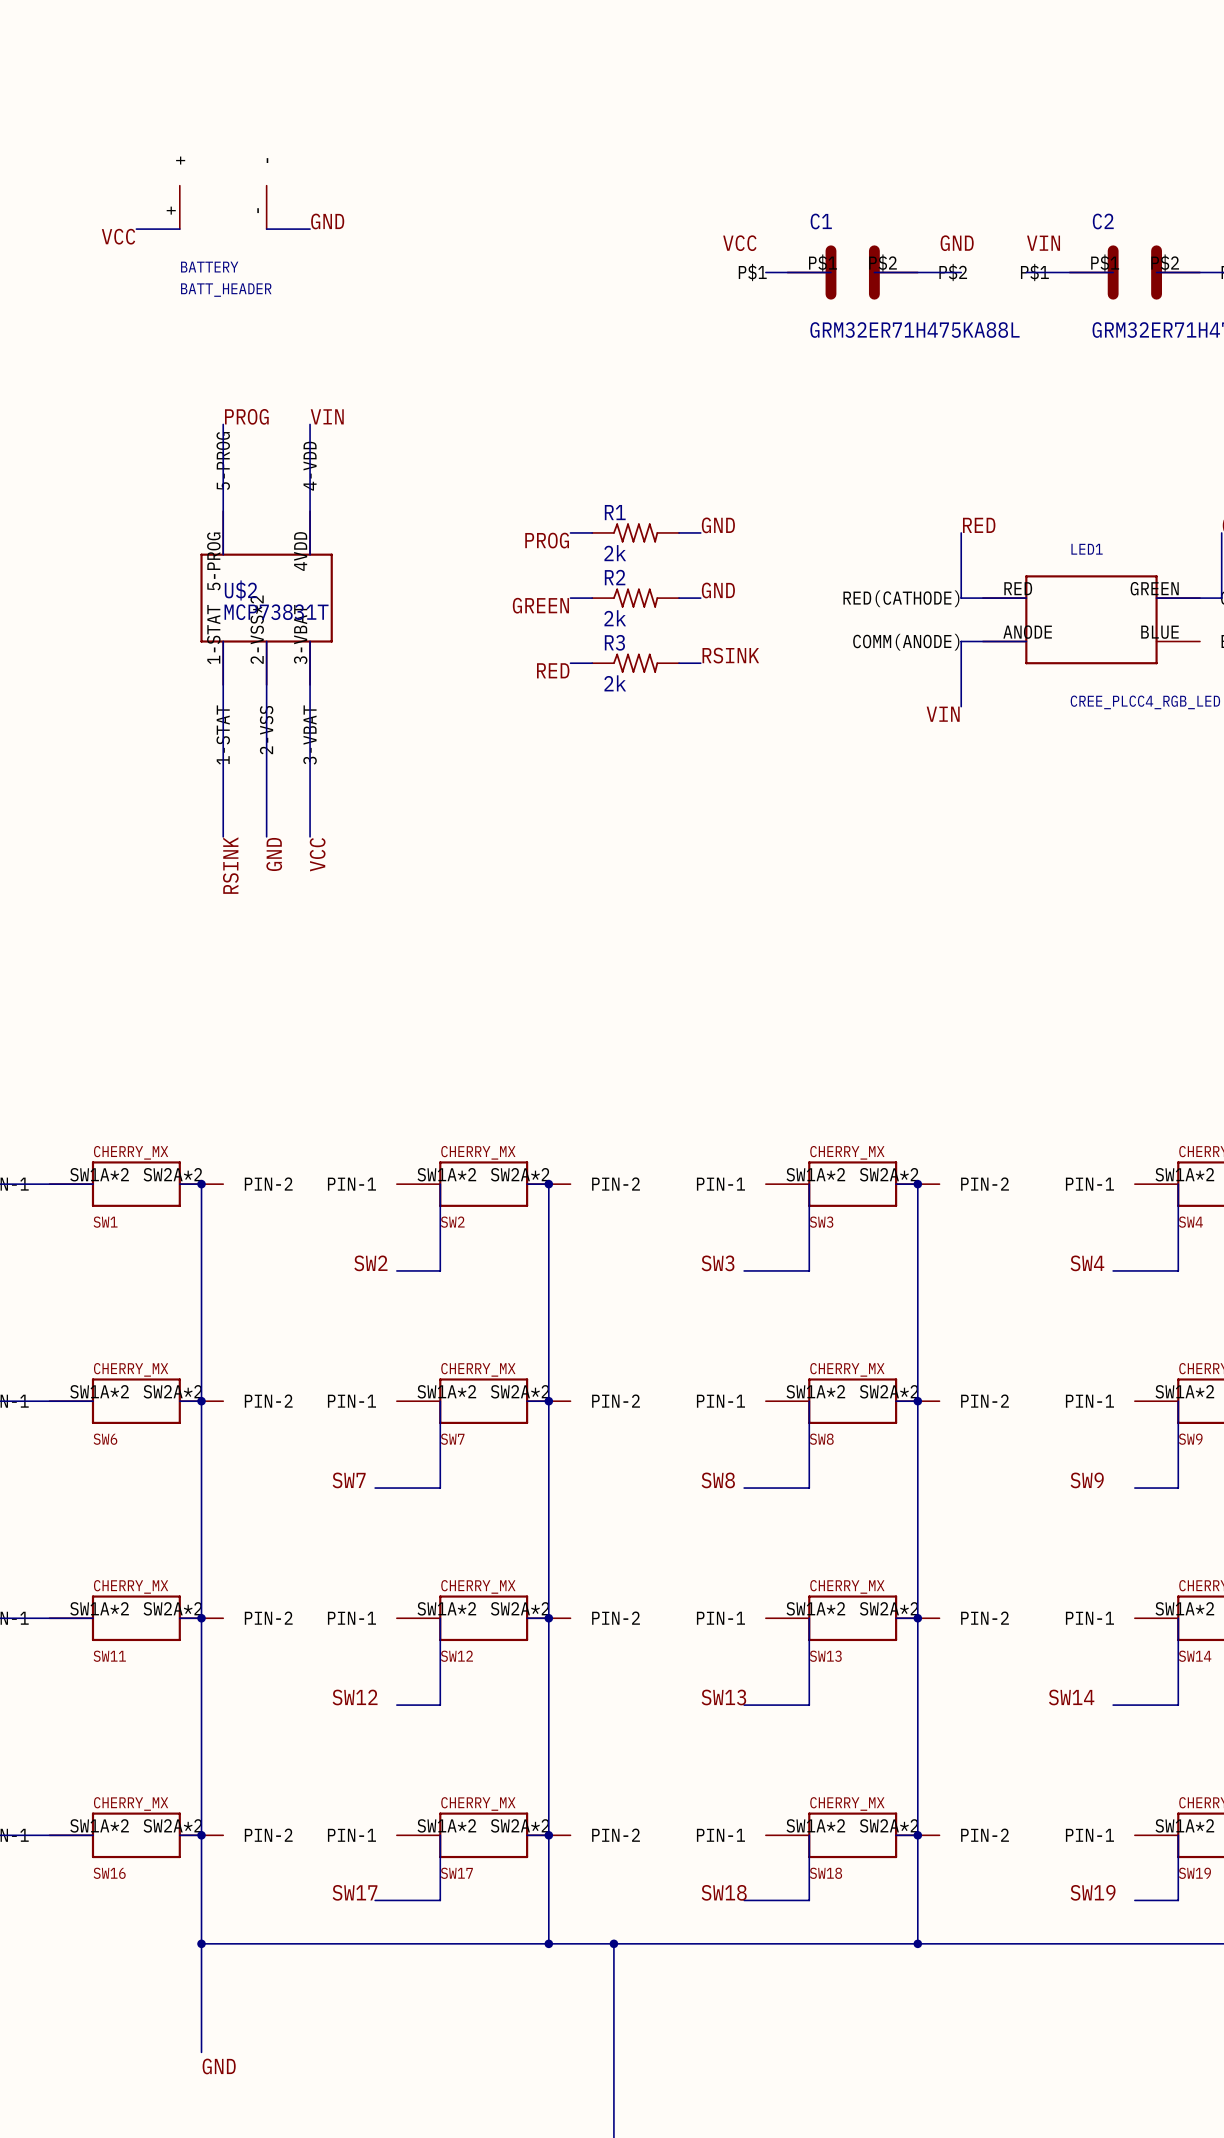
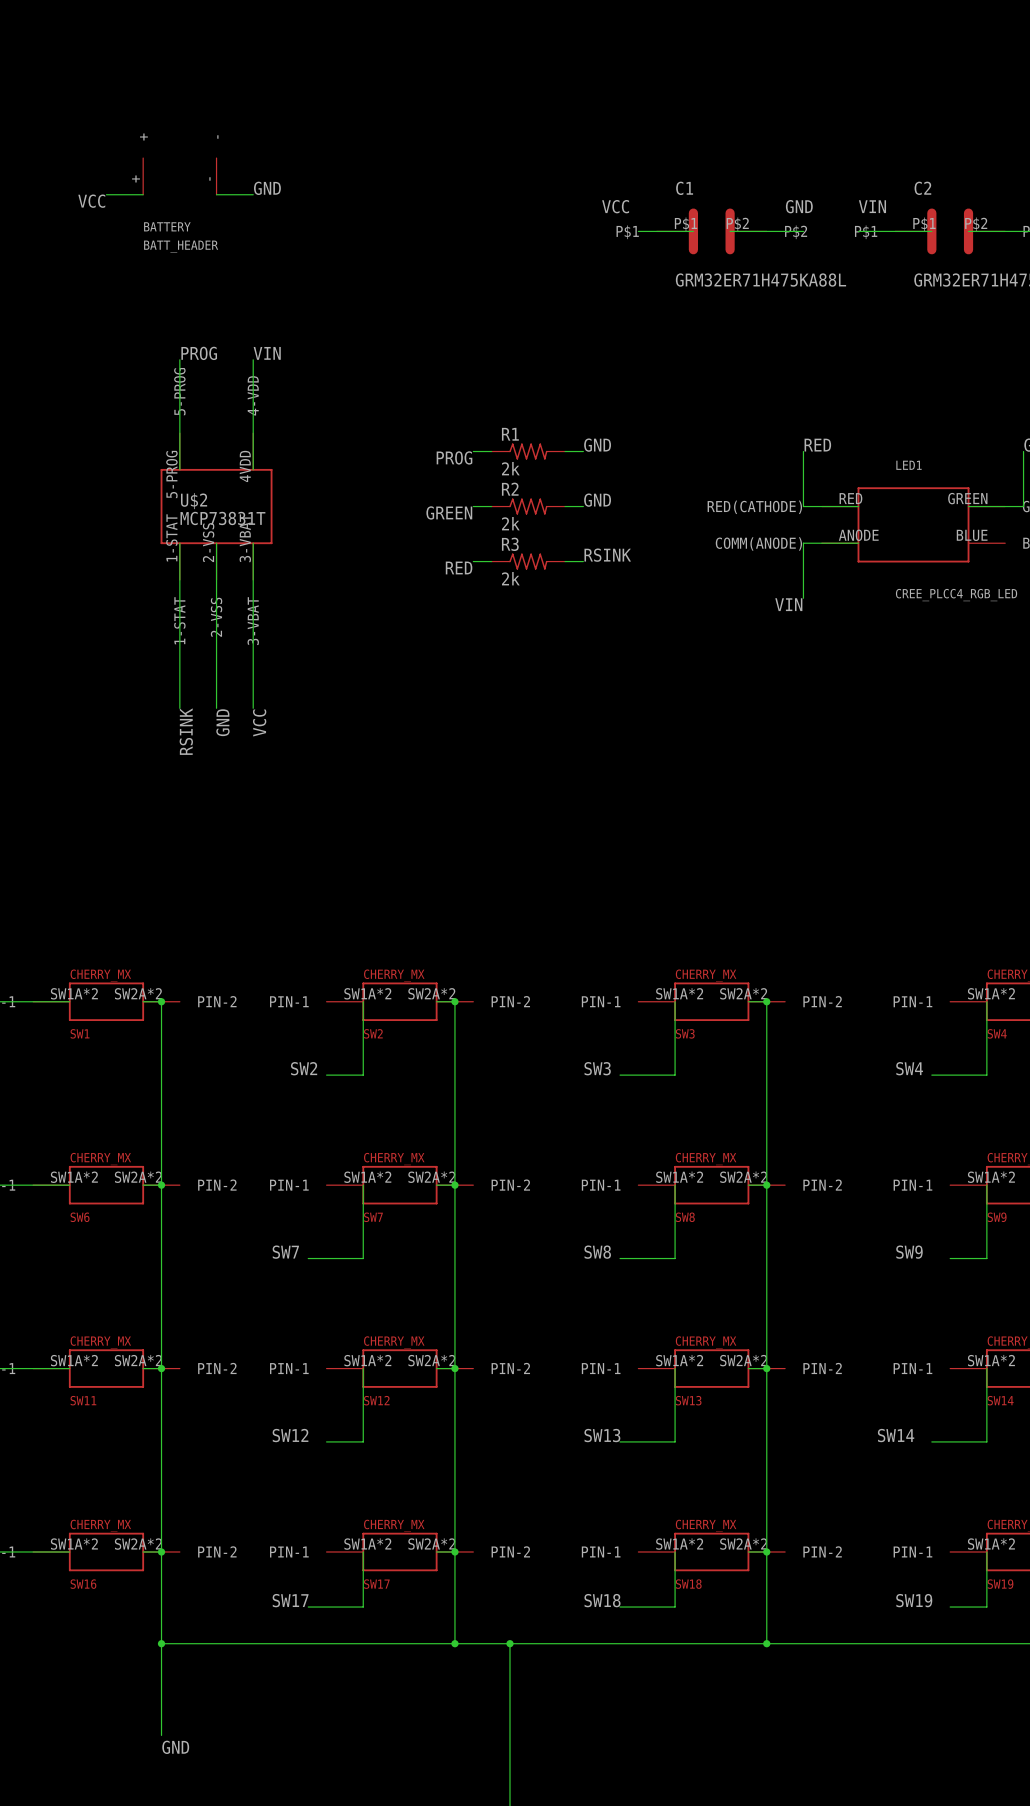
U$2 pin number: 2-VSS*2 (257, 629) -> 2-VSS (208, 542)

